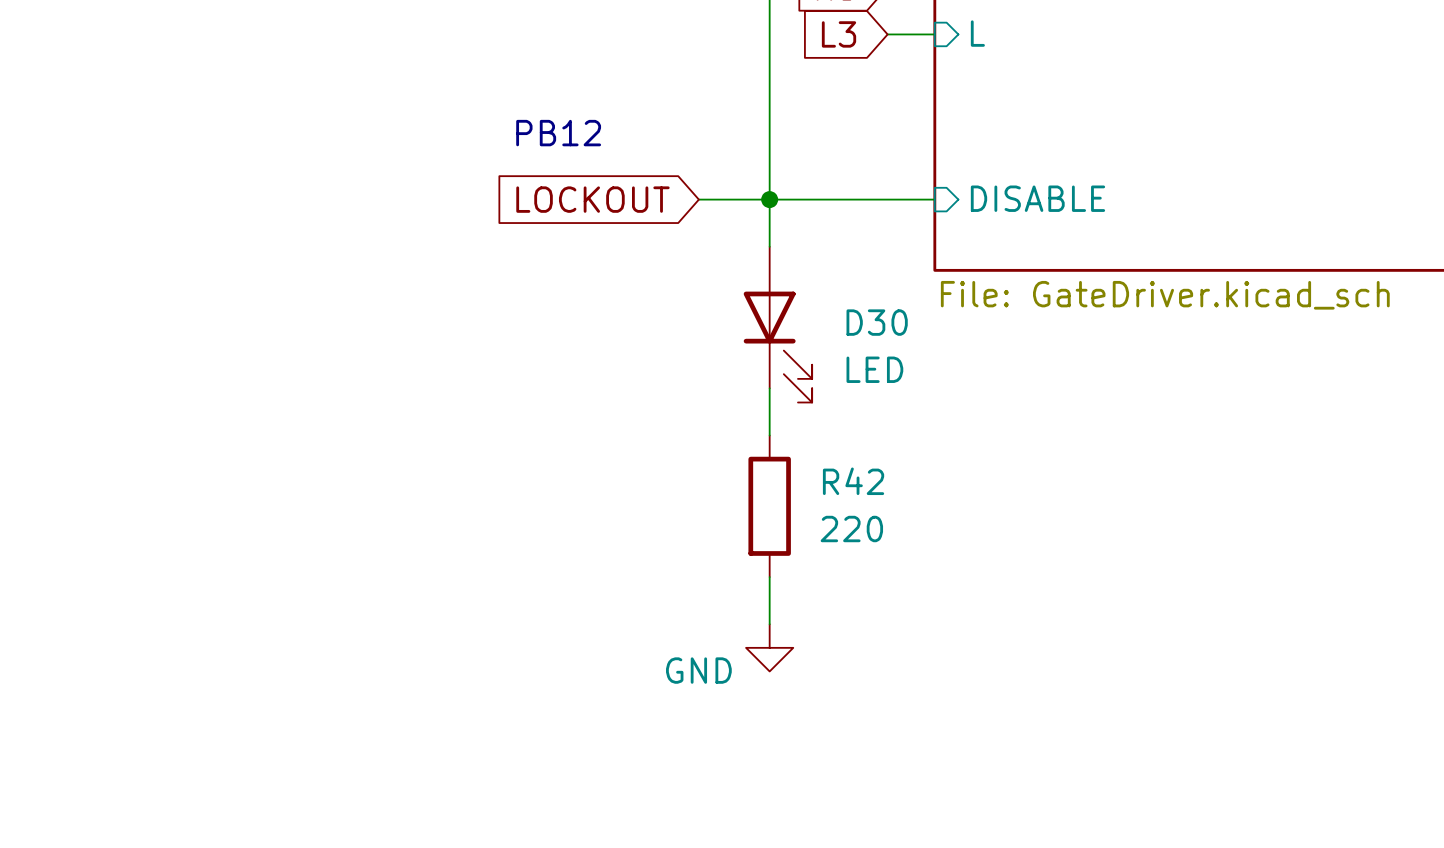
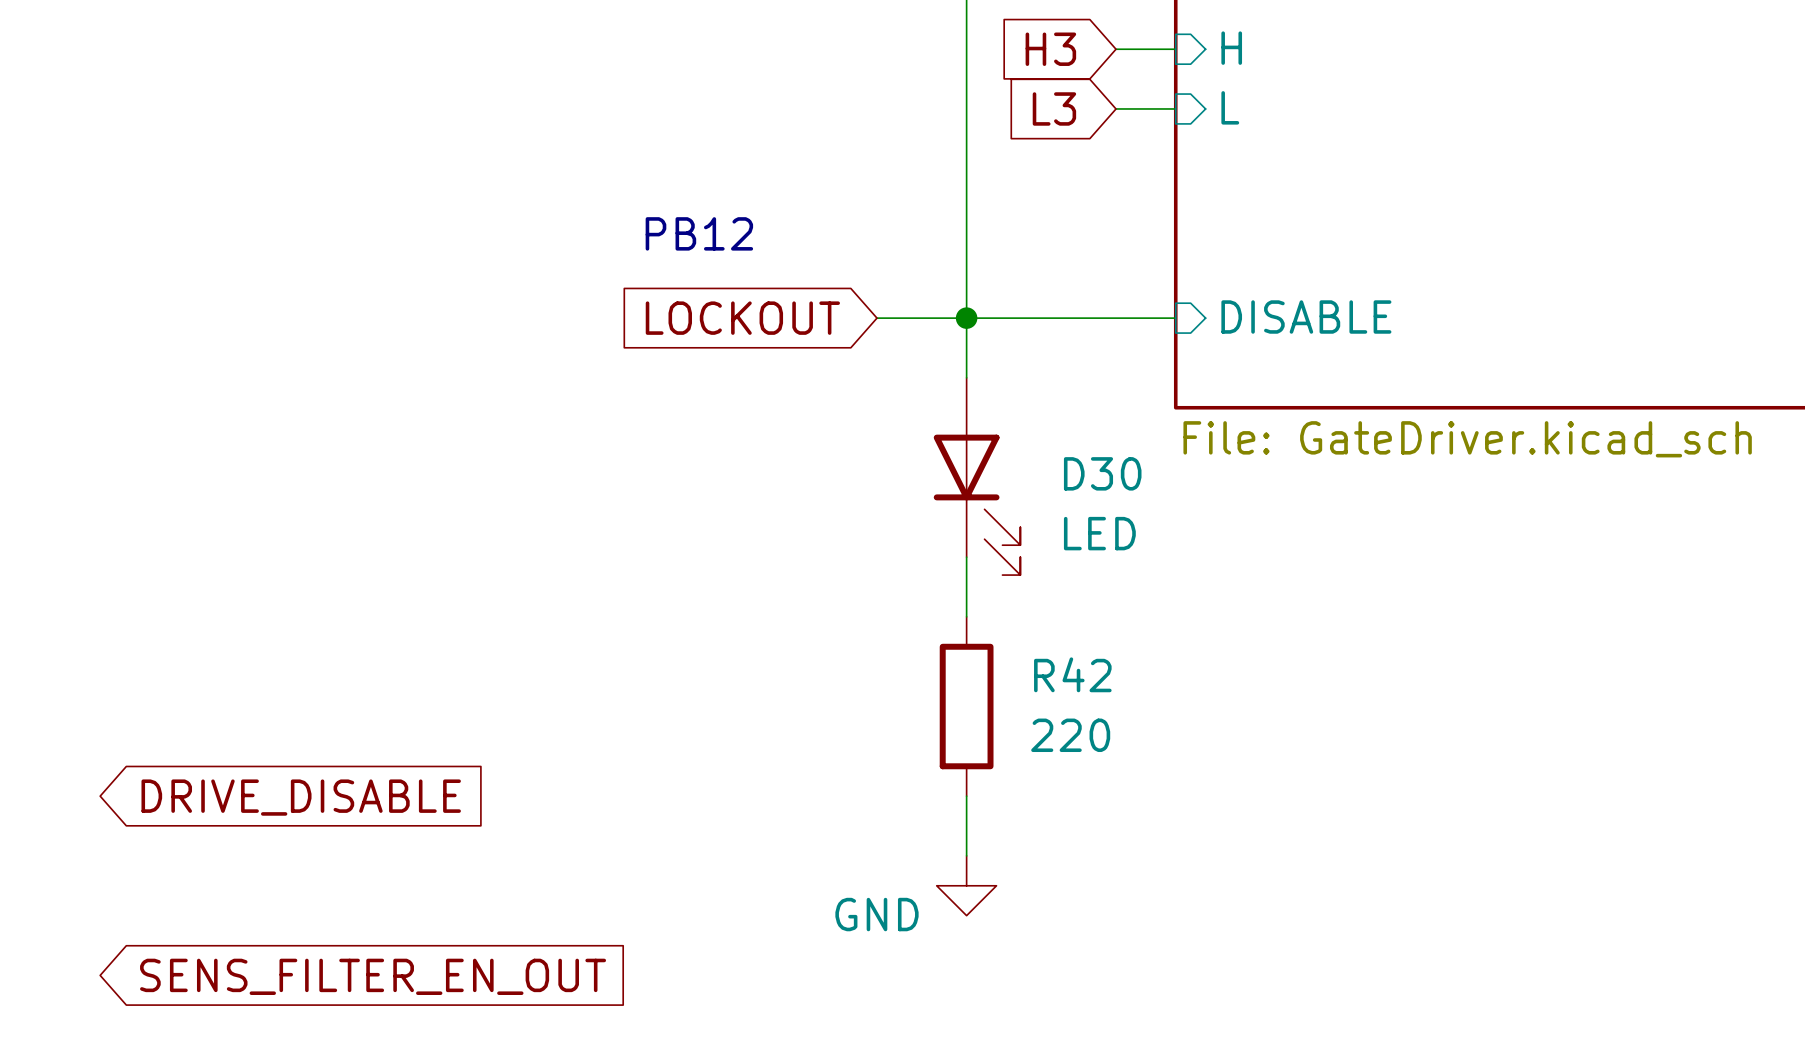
global label: none -> DRIVE_DISABLE (301, 797)
global label: none -> SENS_FILTER_EN_OUT (373, 976)

